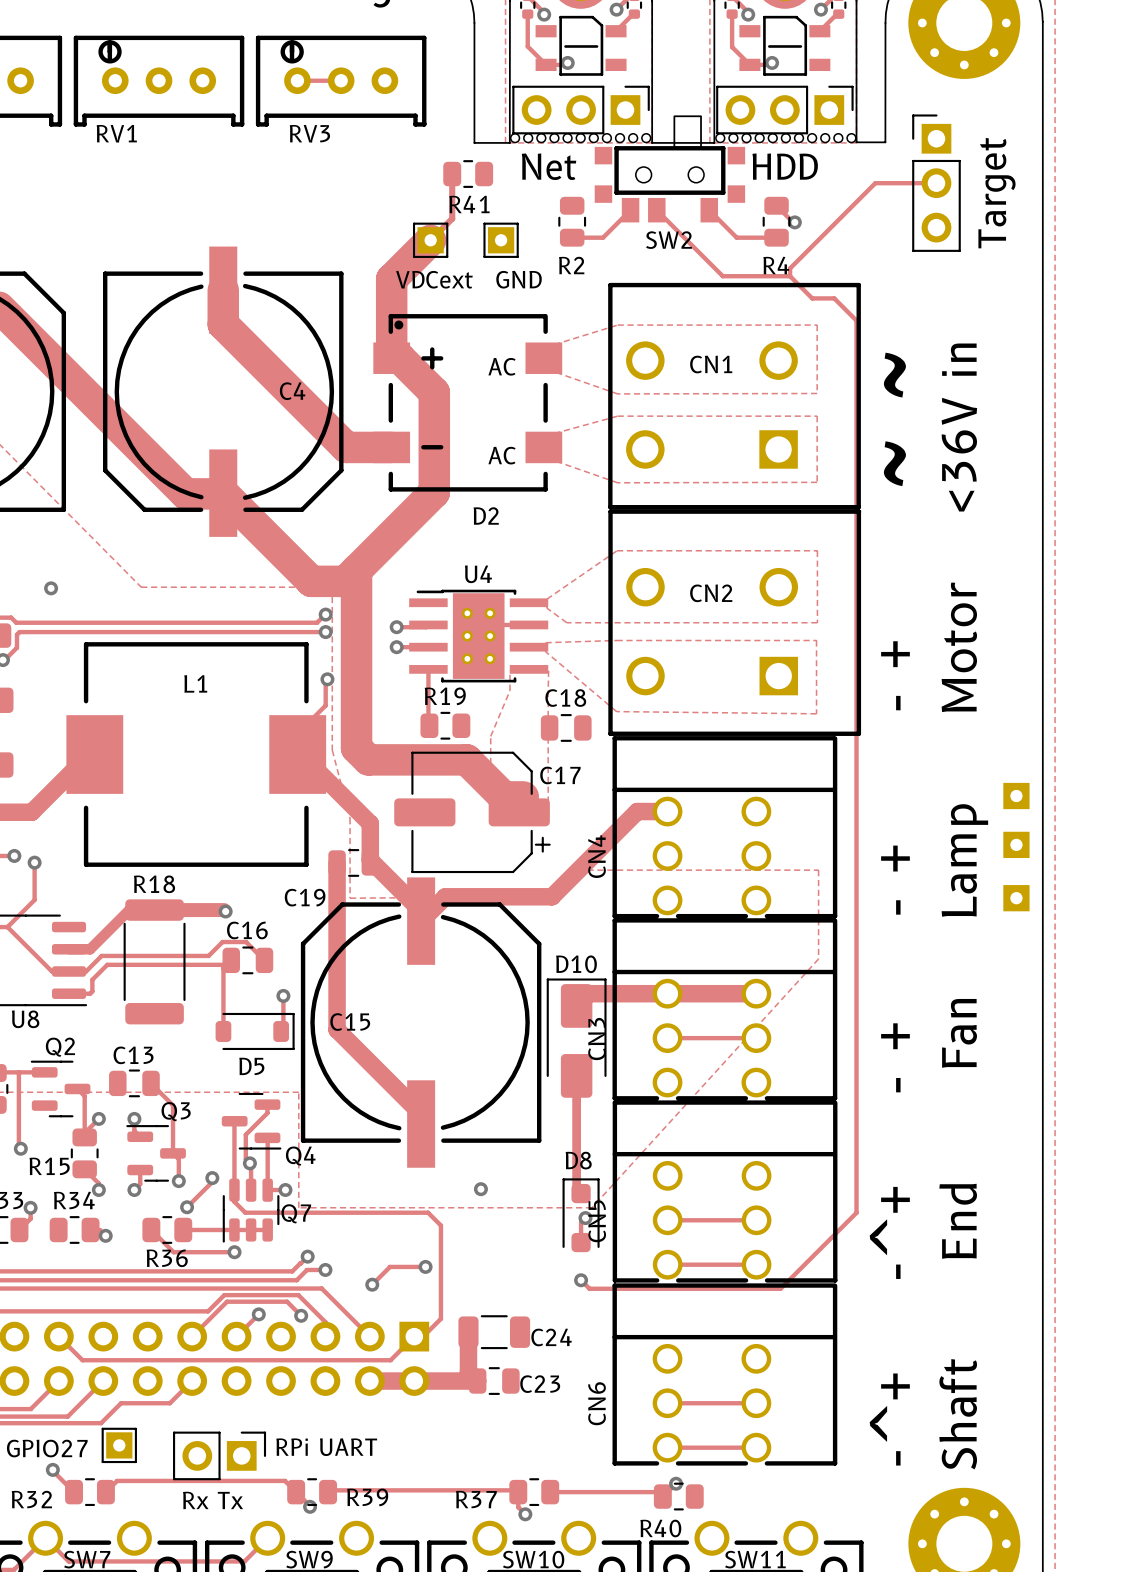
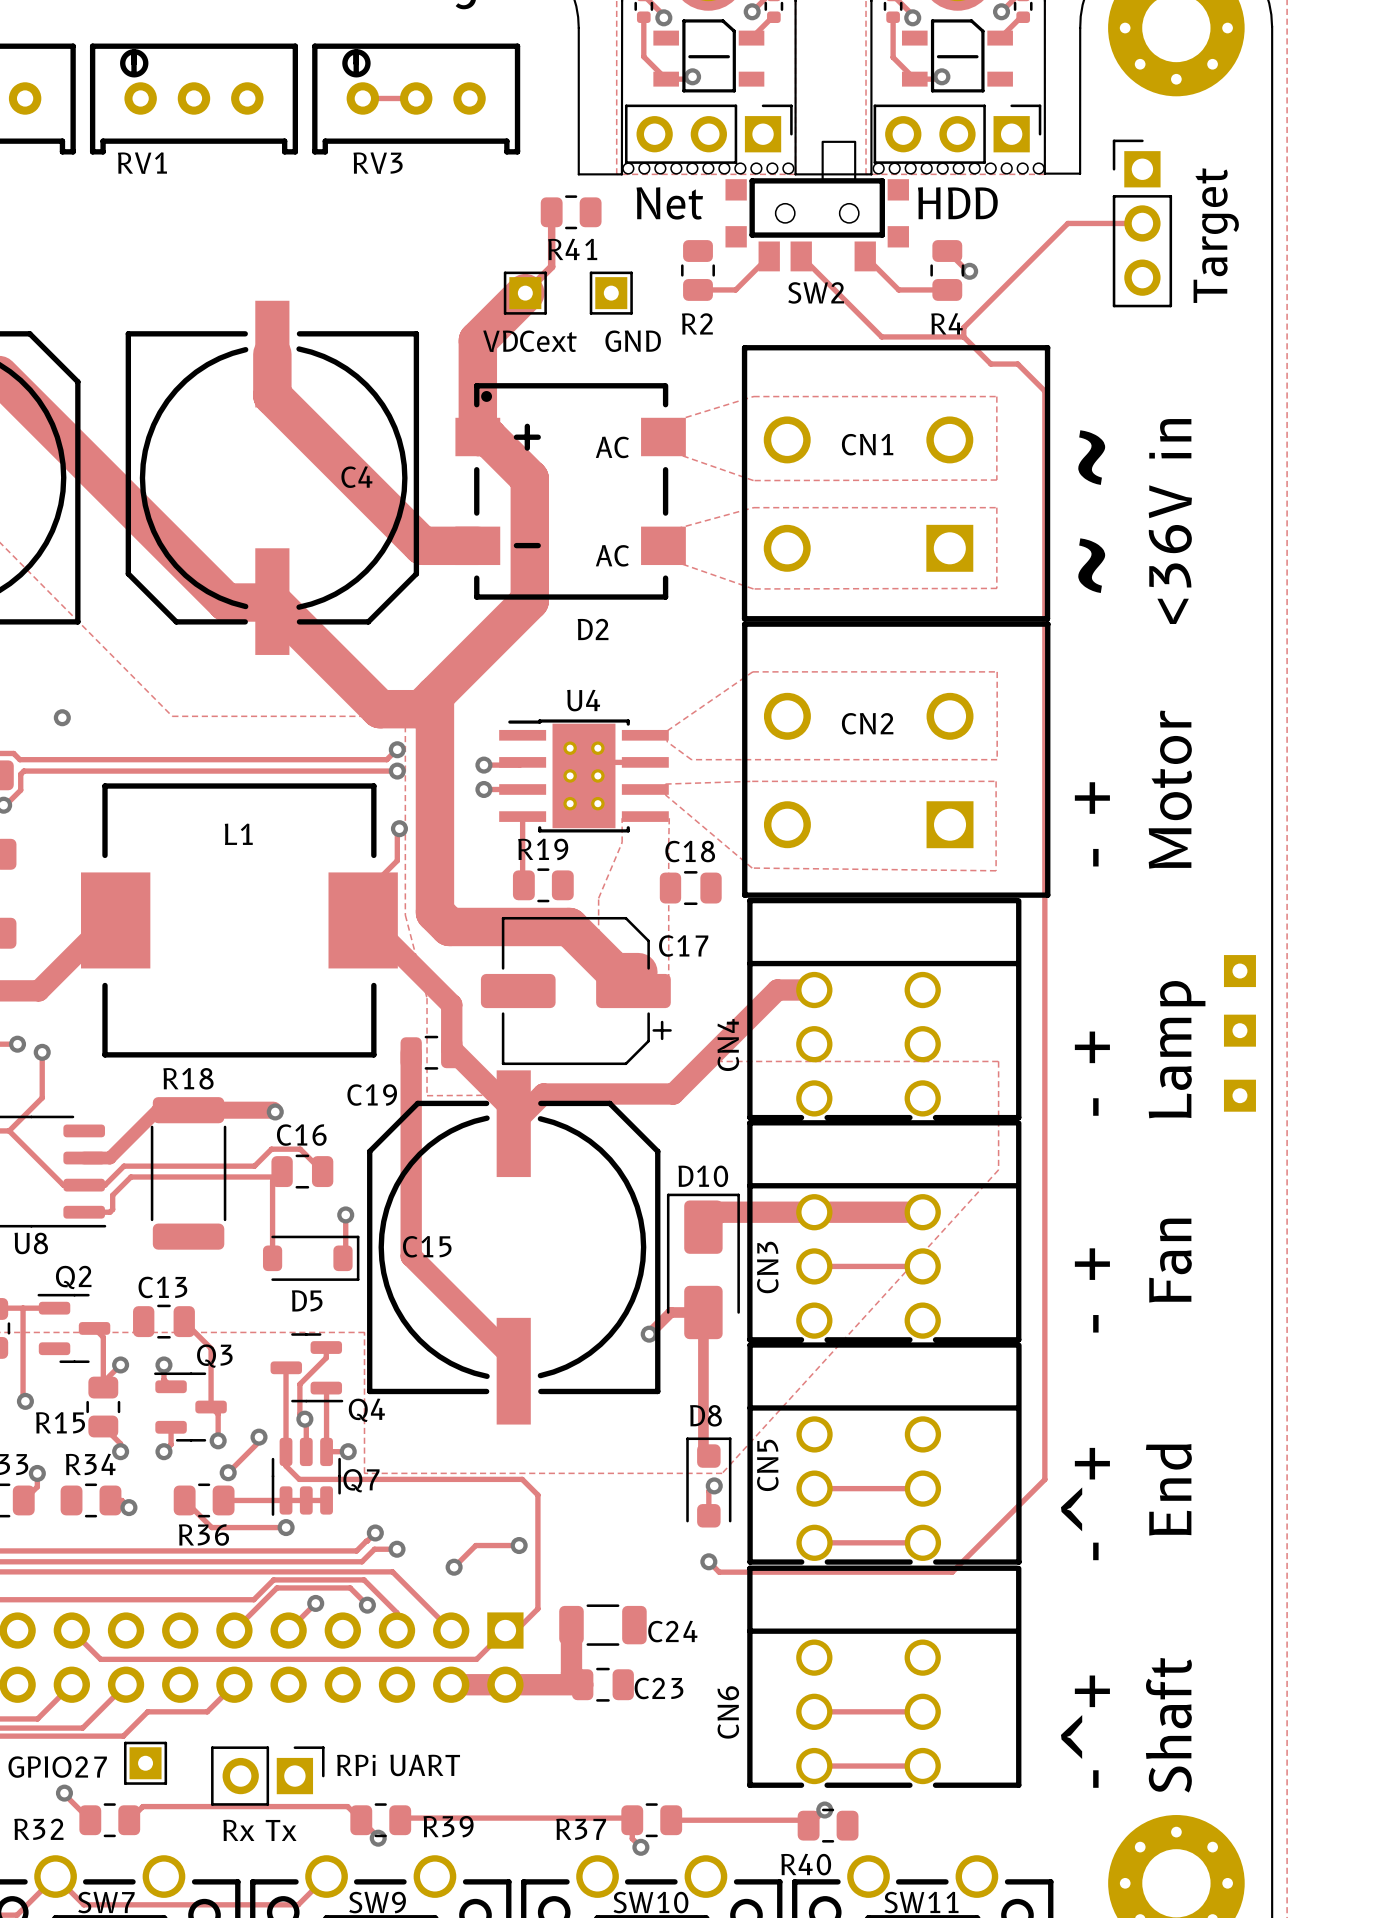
CN3 name position: CN3 (597, 1039) -> CN3 (767, 1267)
track: none -> (703, 1312) (670, 1312) (649, 1334)
via: none -> (649, 1334)
via: (480, 1189) -> none
CN5 name position: CN5 (597, 1221) -> CN5 (767, 1465)

